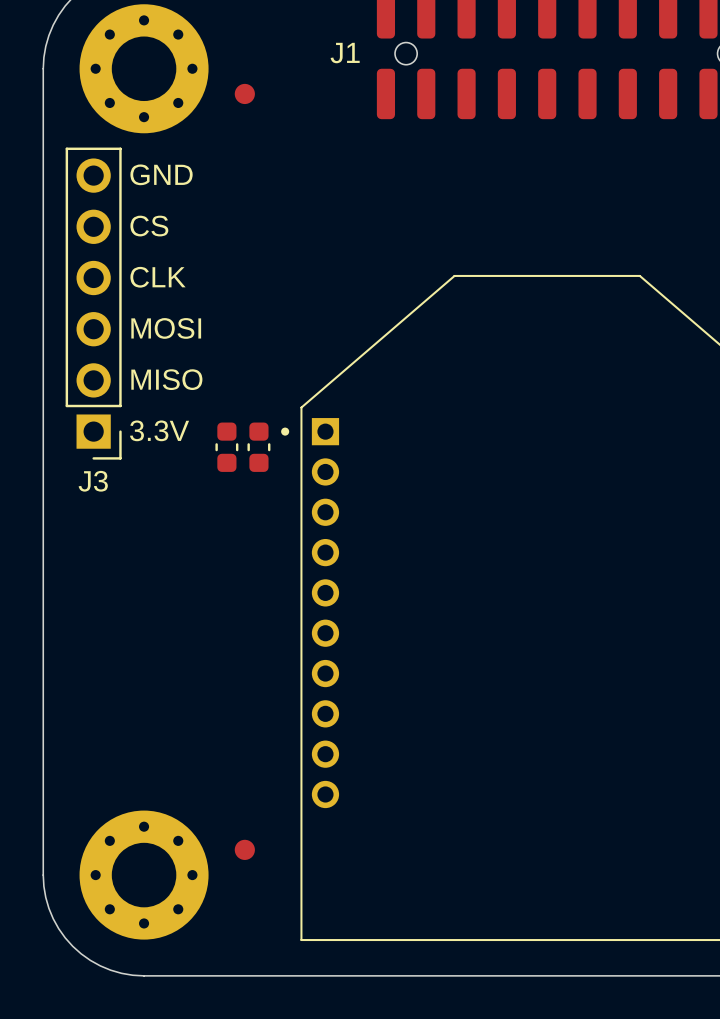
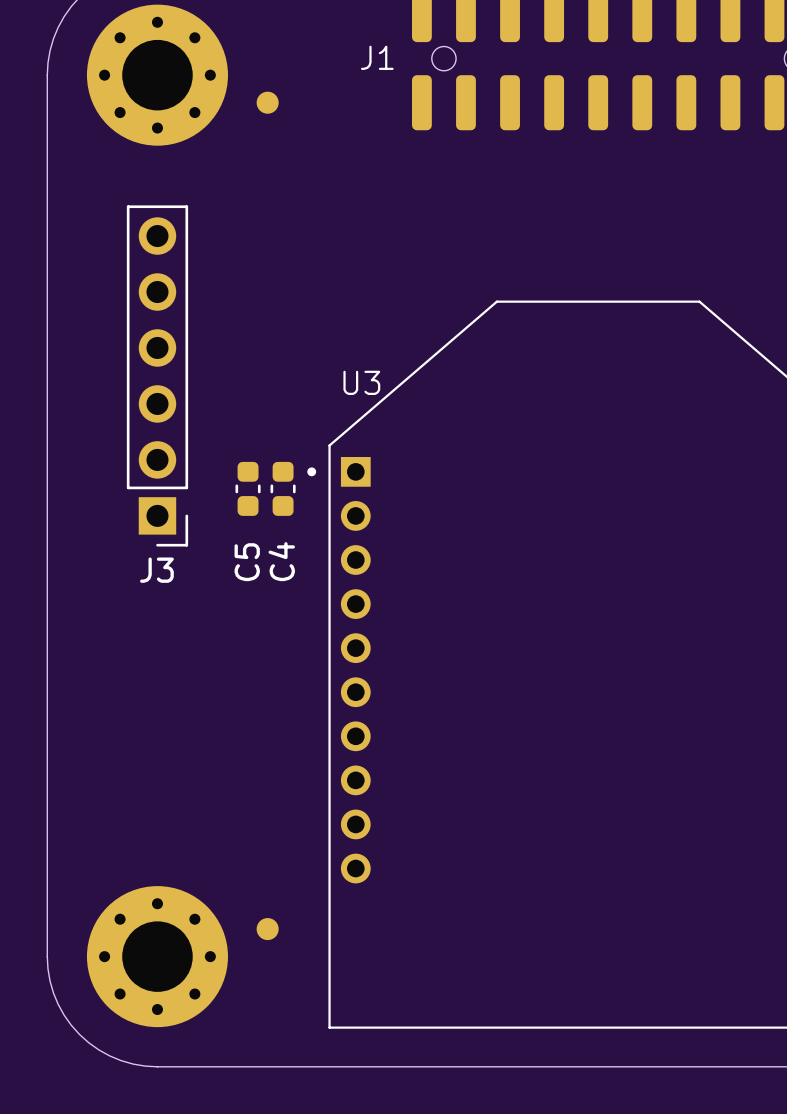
text: GND (161, 174) -> none
text: CS (149, 226) -> none
text: CLK (158, 277) -> none
J3 position: (93, 303) -> (157, 375)
text: MOSI (166, 328) -> none
U3 name: none -> U3 (361, 382)
text: MISO (166, 379) -> none
text: 3.3V (159, 430) -> none
C4 name: none -> C4 (281, 561)
C5 name: none -> C5 (247, 562)

